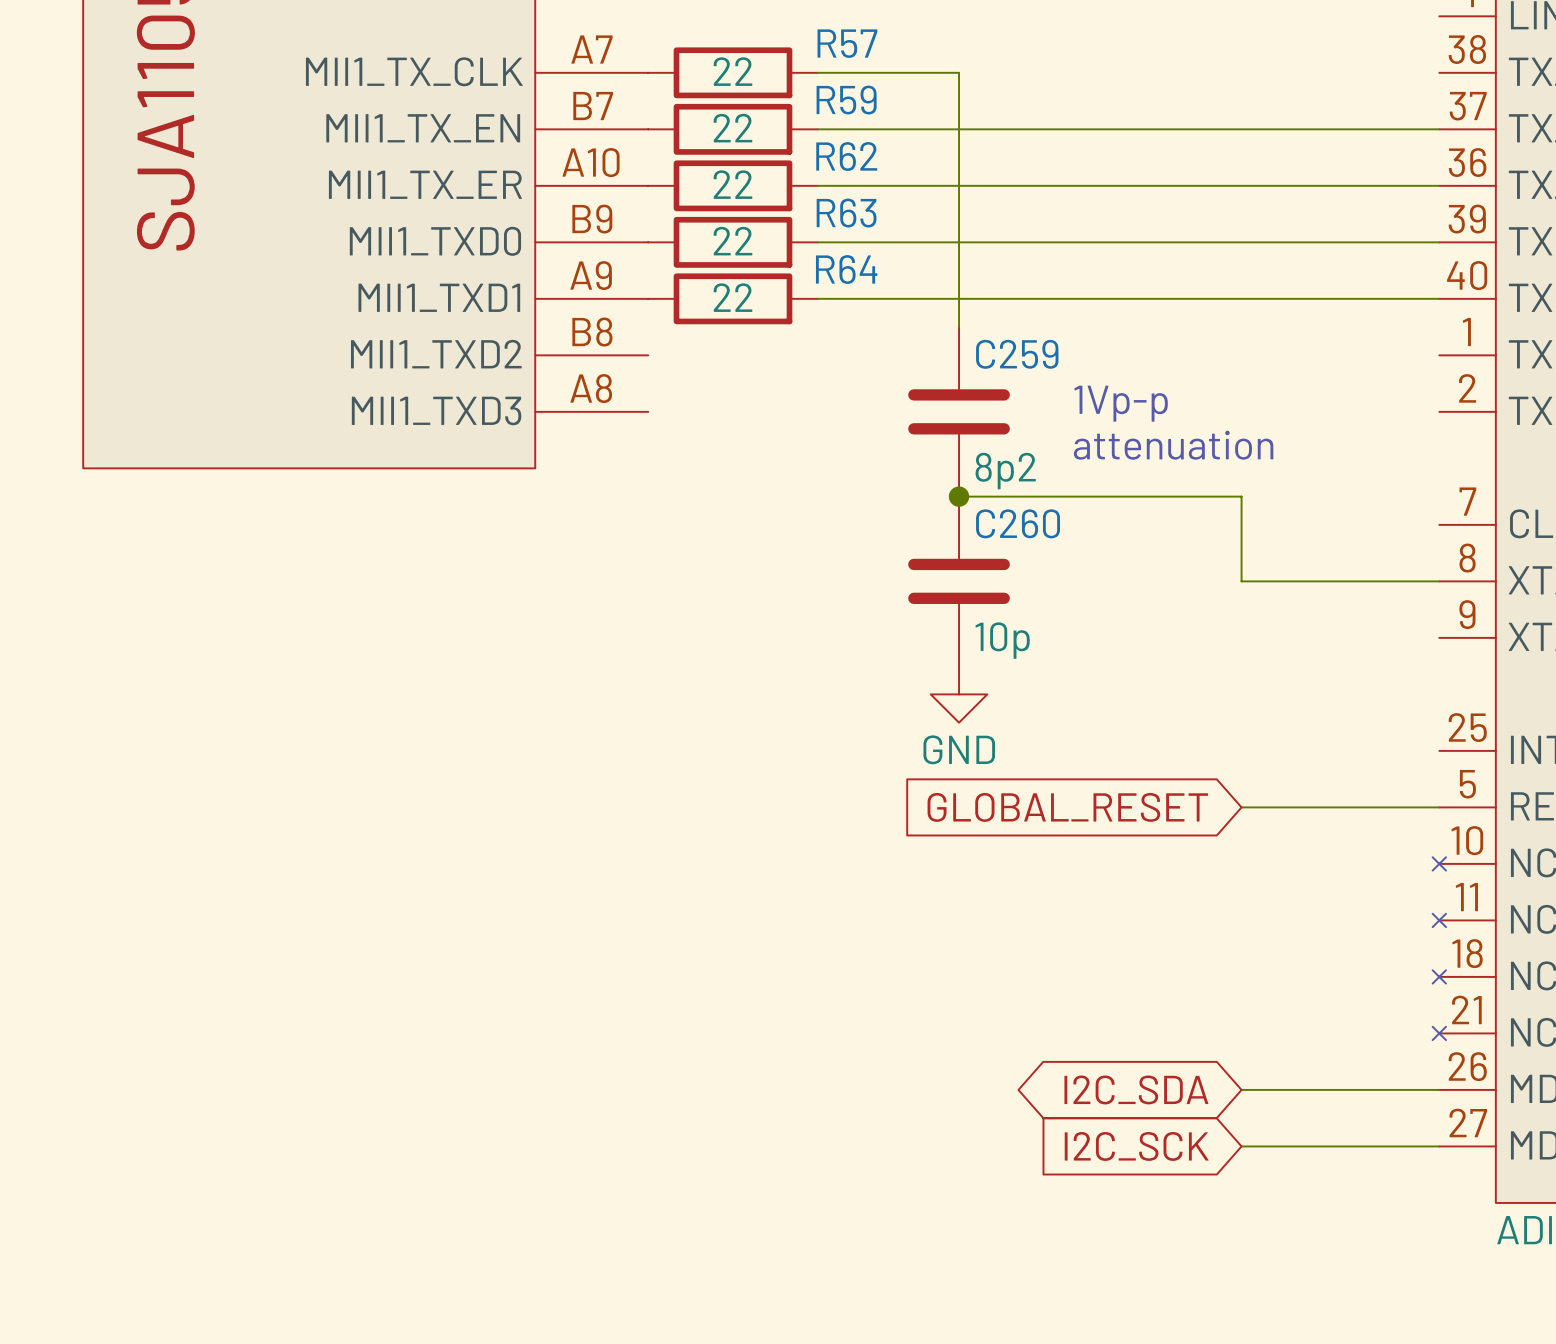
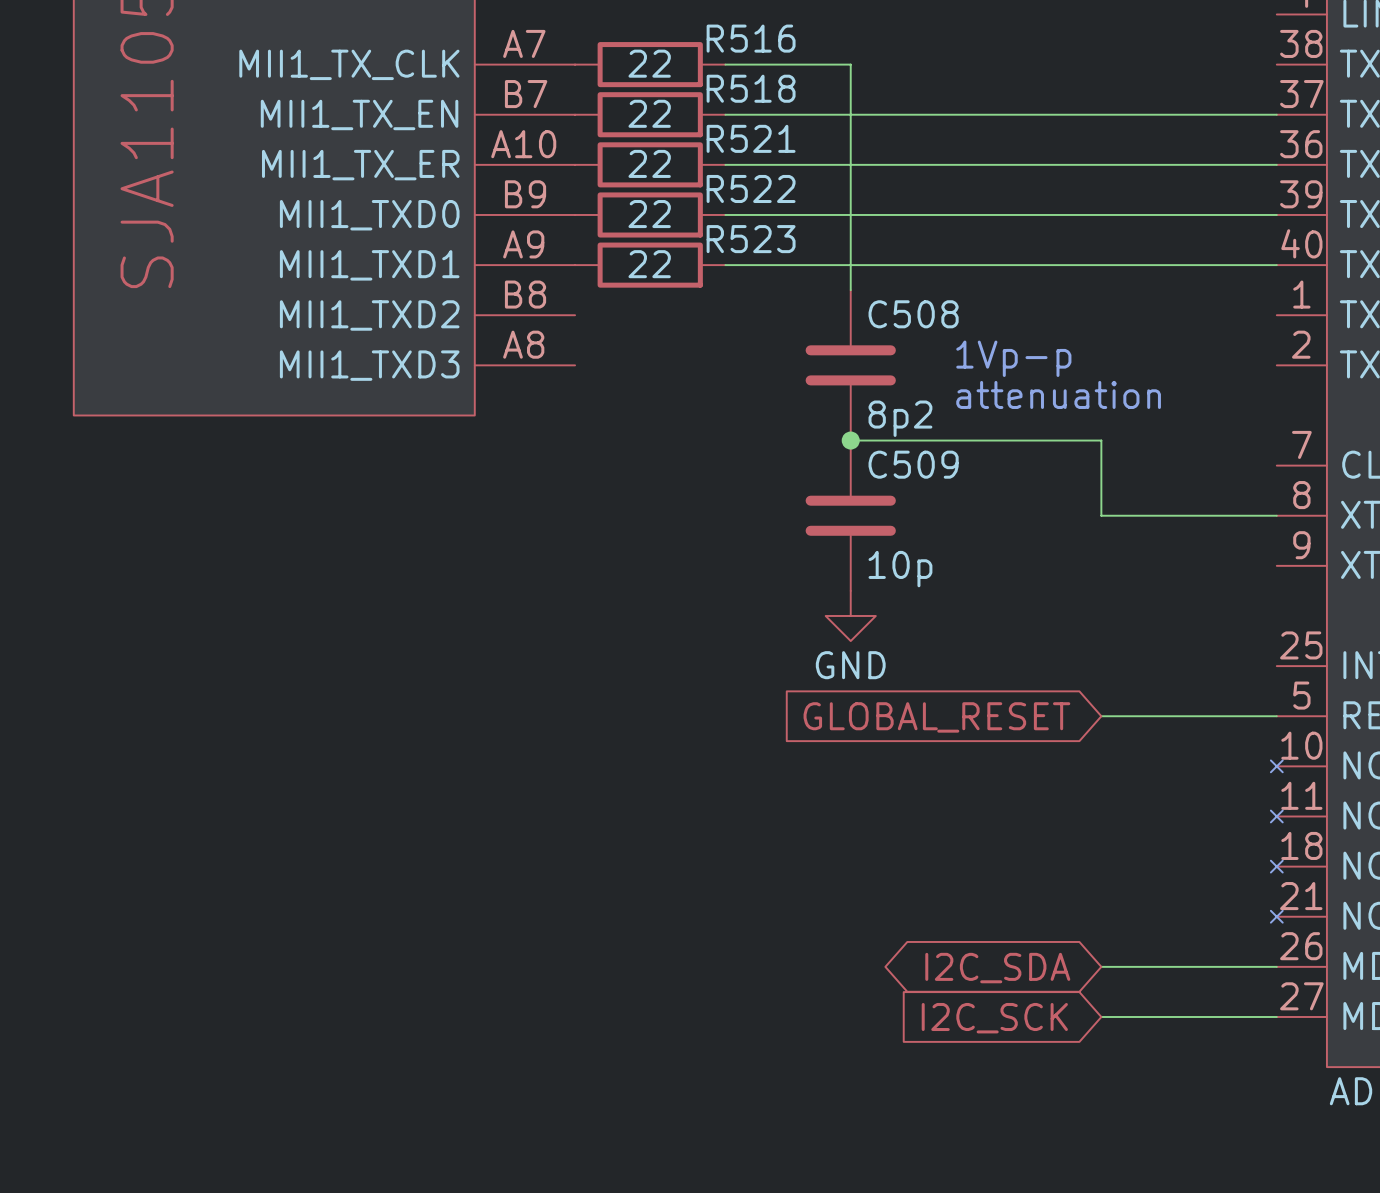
R57 name: R57 (847, 43) -> R516 (751, 38)
R59 name: R59 (846, 100) -> R518 (751, 88)
R62 name: R62 (846, 156) -> R521 (751, 138)
R63 name: R63 (846, 213) -> R522 (751, 188)
R64 name: R64 (846, 269) -> R523 (751, 239)
C259 name: C259 (1017, 354) -> C508 (913, 314)
C260 name: C260 (1018, 523) -> C509 (913, 464)

